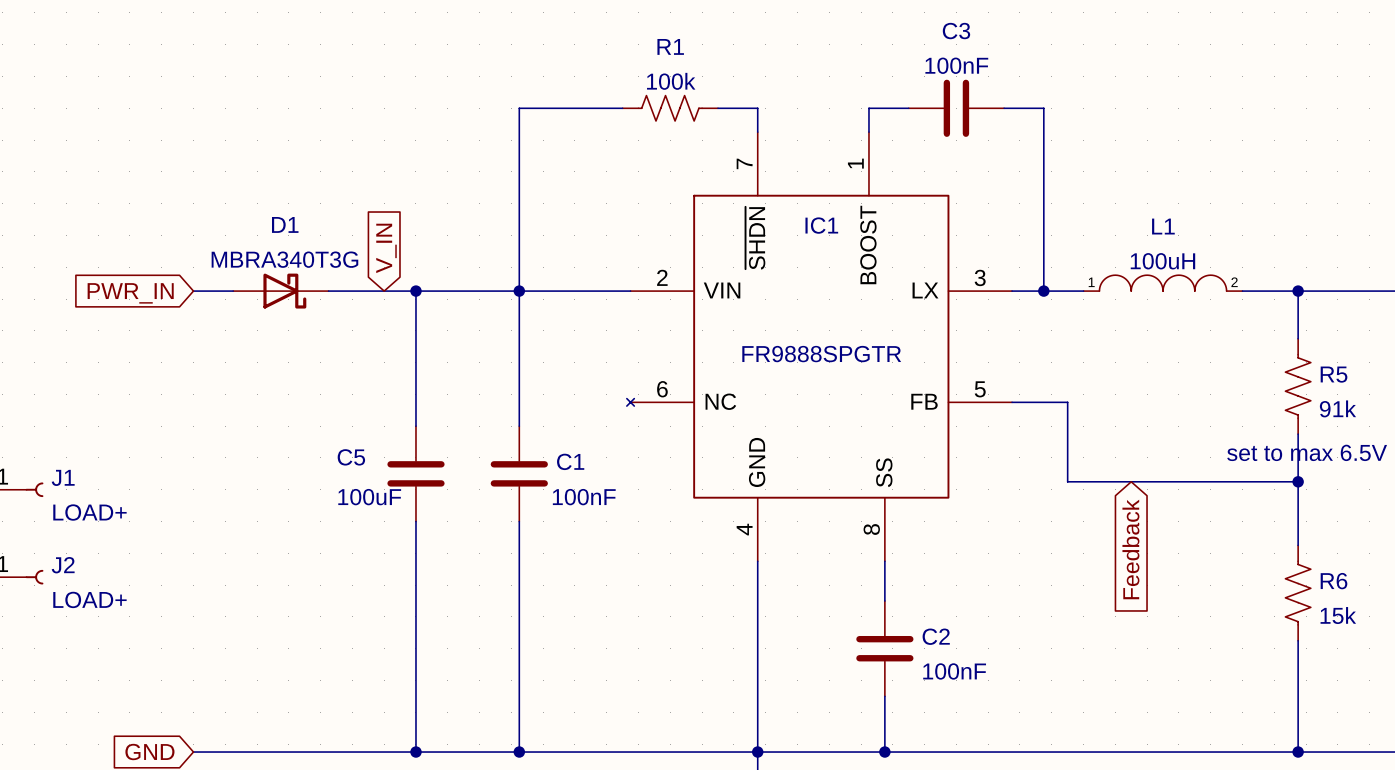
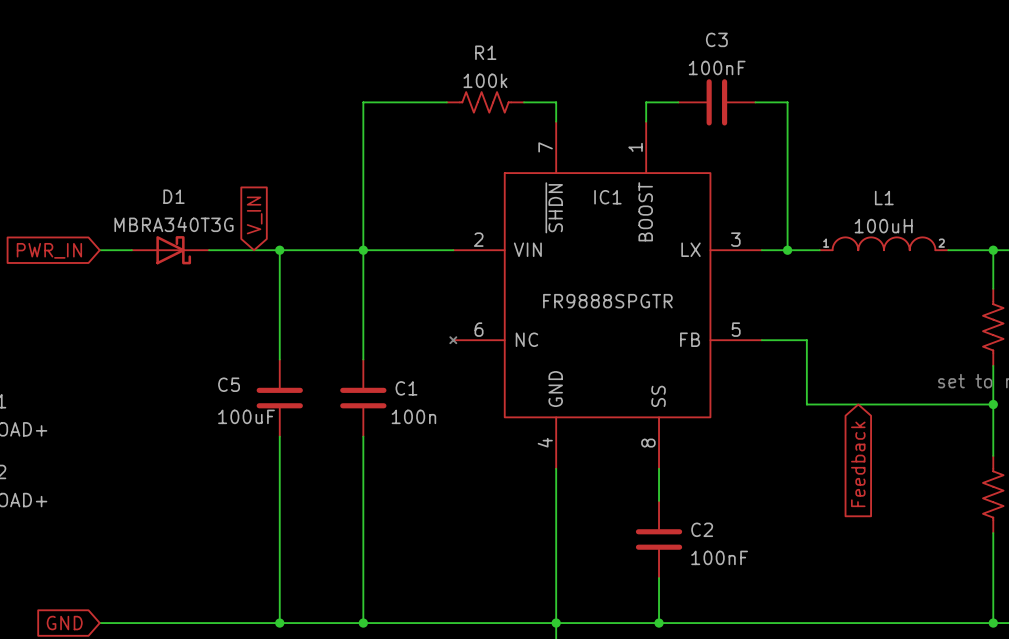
C1 value: 100nF (584, 497) -> 100n (413, 416)

